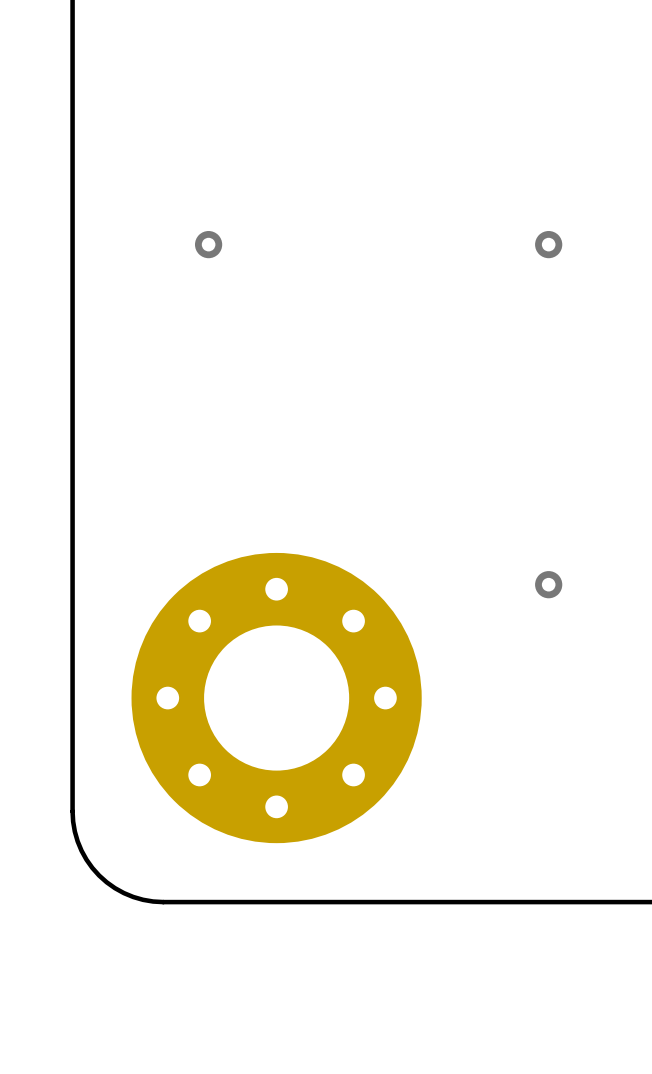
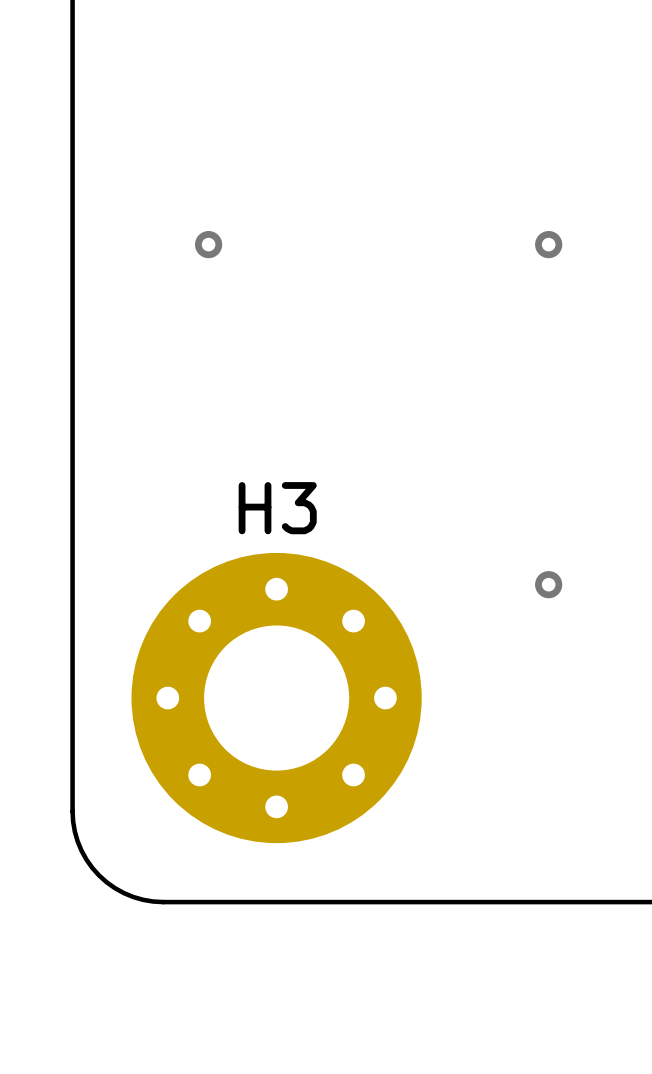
H3 name: none -> H3 (277, 508)

